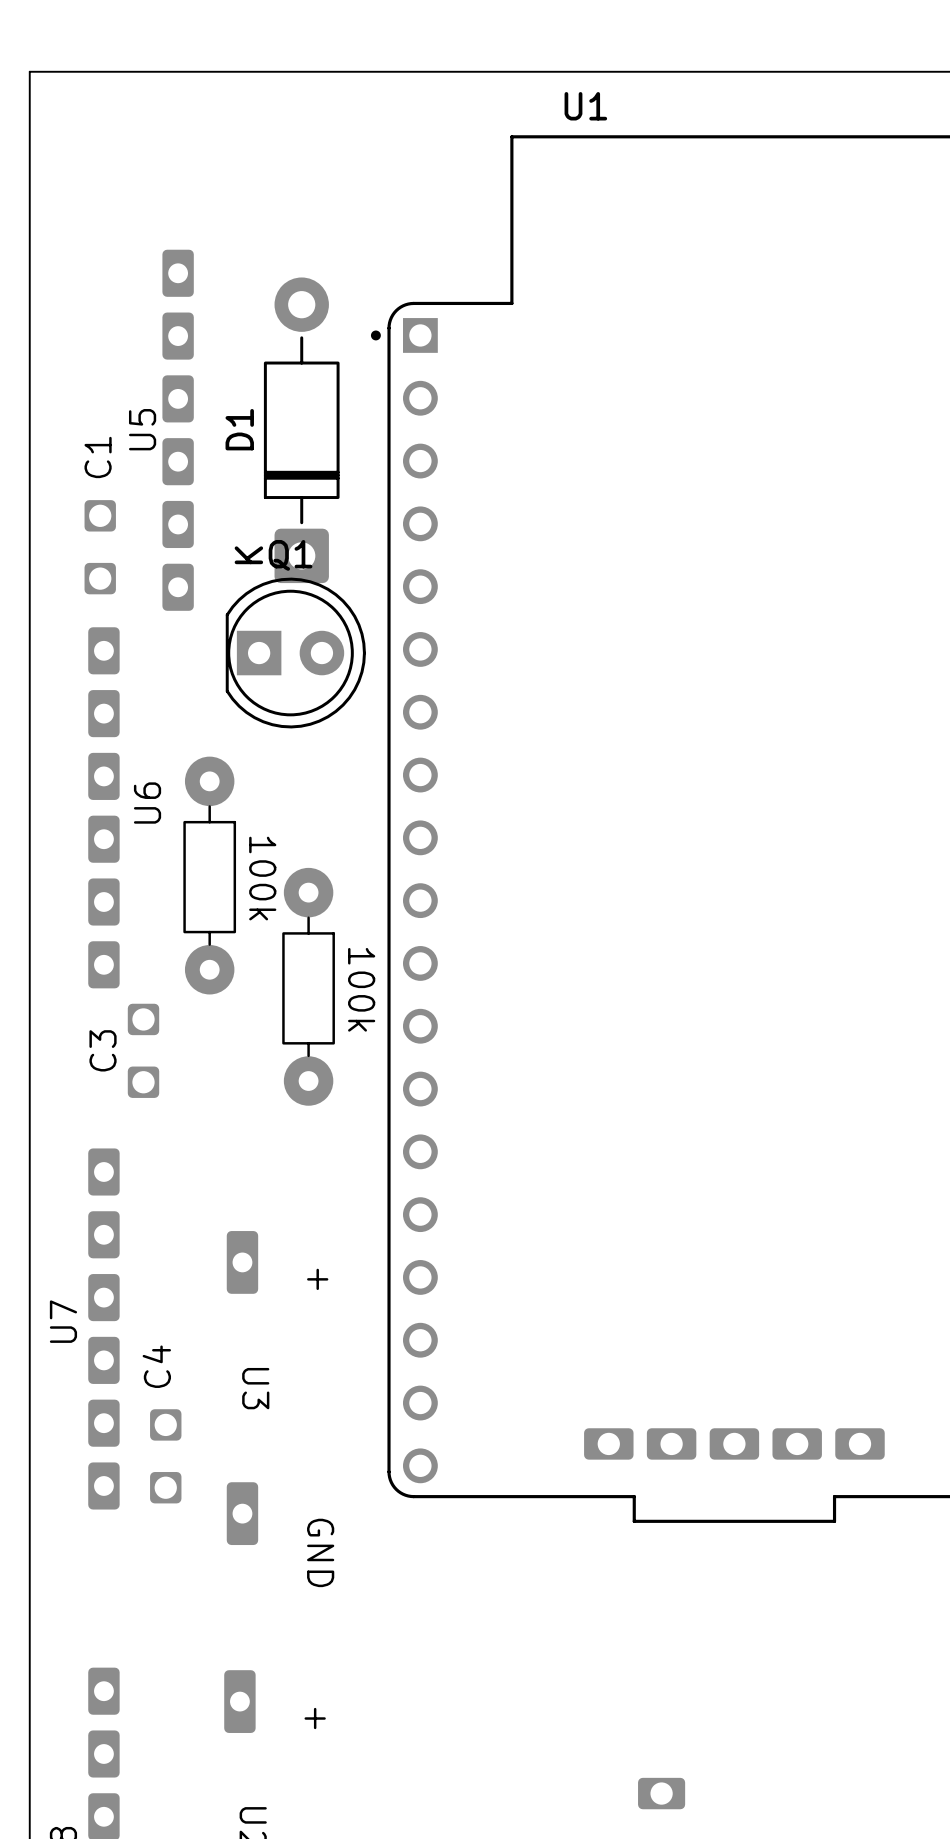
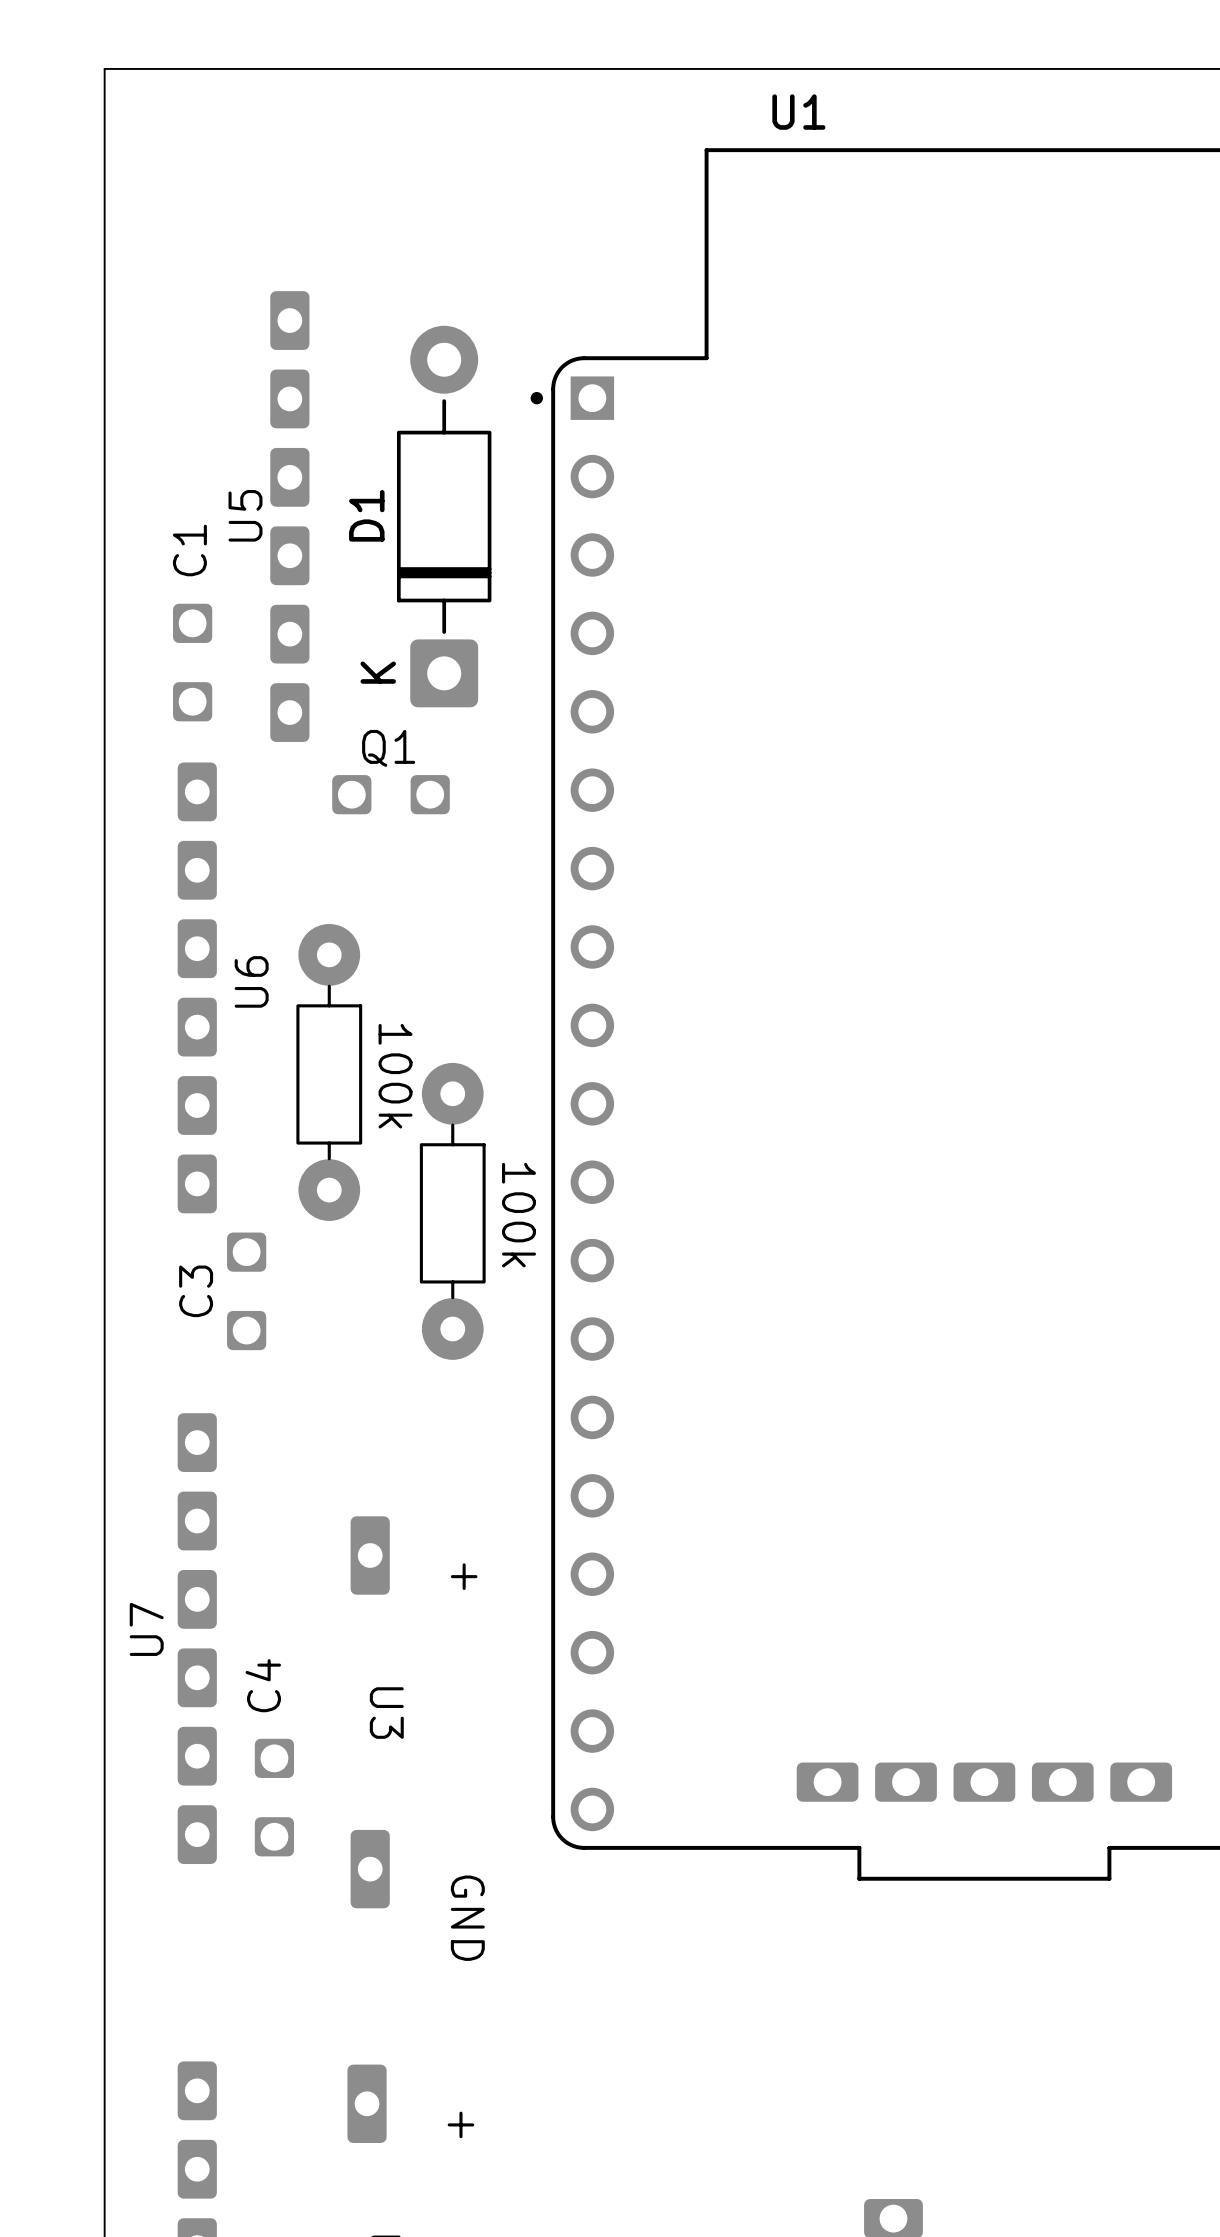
Q1 name position: Q1 (290, 555) -> Q1 (388, 748)
Q1 footprint: [225, 577, 366, 729] -> [332, 775, 450, 815]

